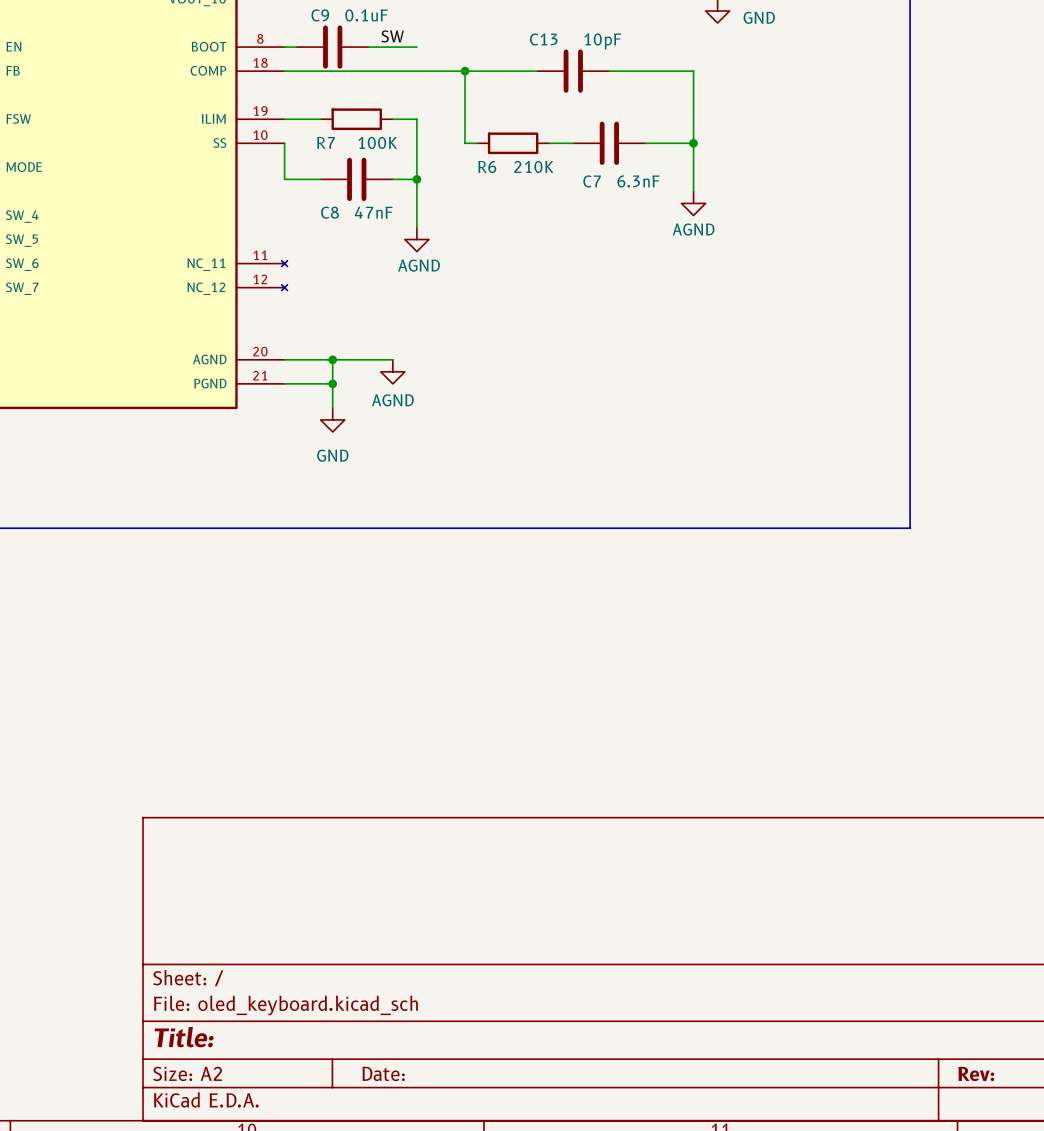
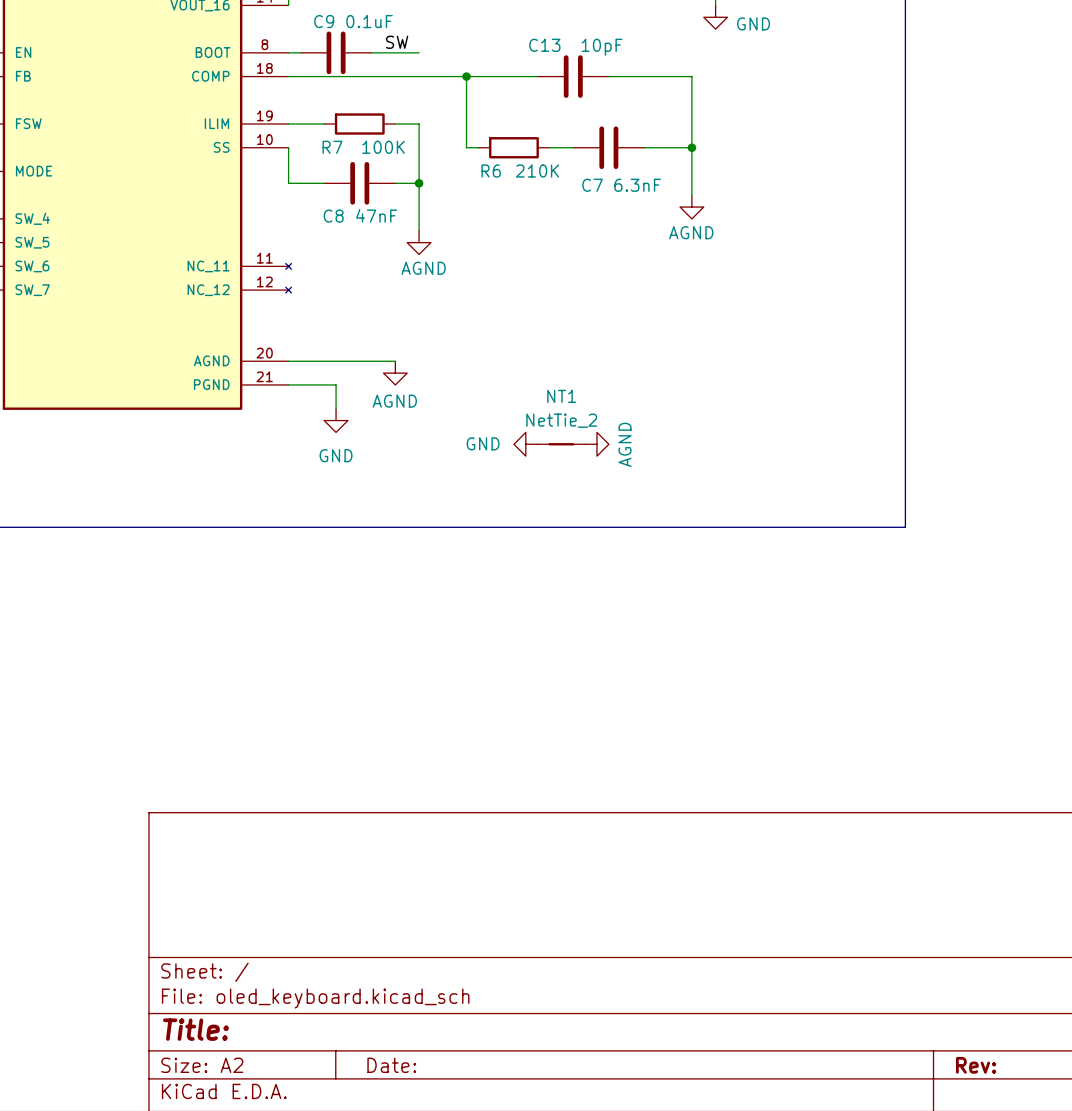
wire: (332, 359) (332, 383) -> none
junction: (332, 359) -> none
junction: (332, 383) -> none
power symbol: none -> GND (525, 444)
NT1: none -> NetTie_2 (561, 444)
power symbol: none -> AGND (597, 444)

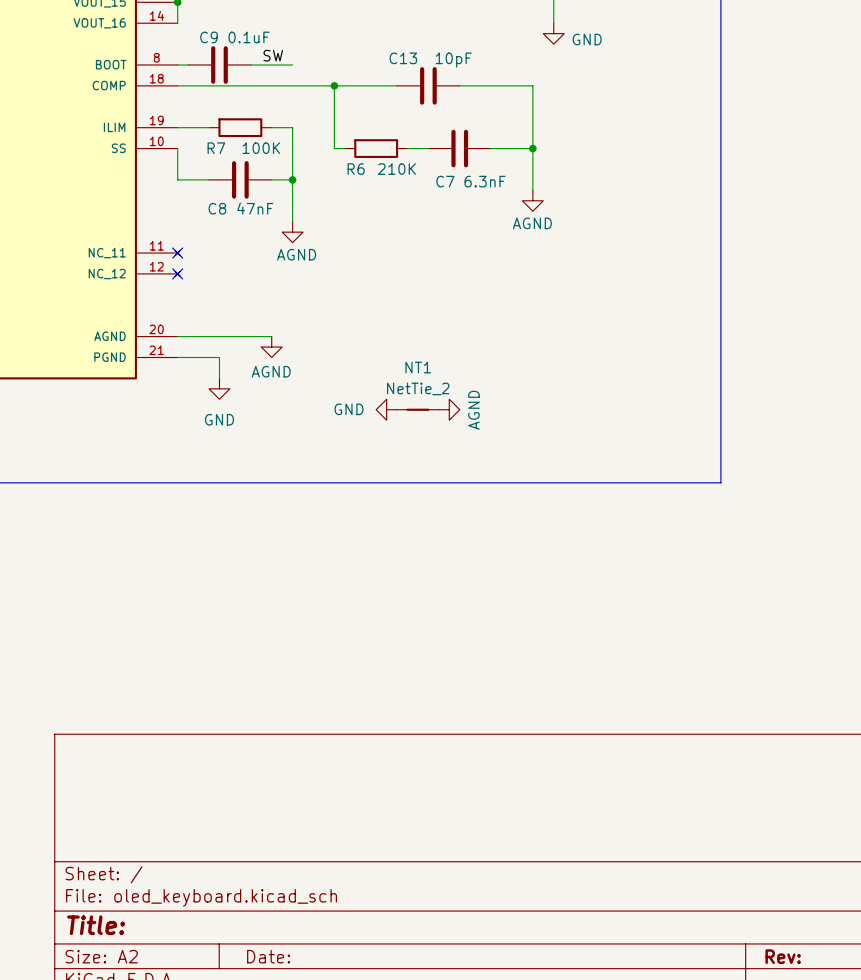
no-connect mark: none -> (177, 253)
no-connect mark: none -> (177, 273)

